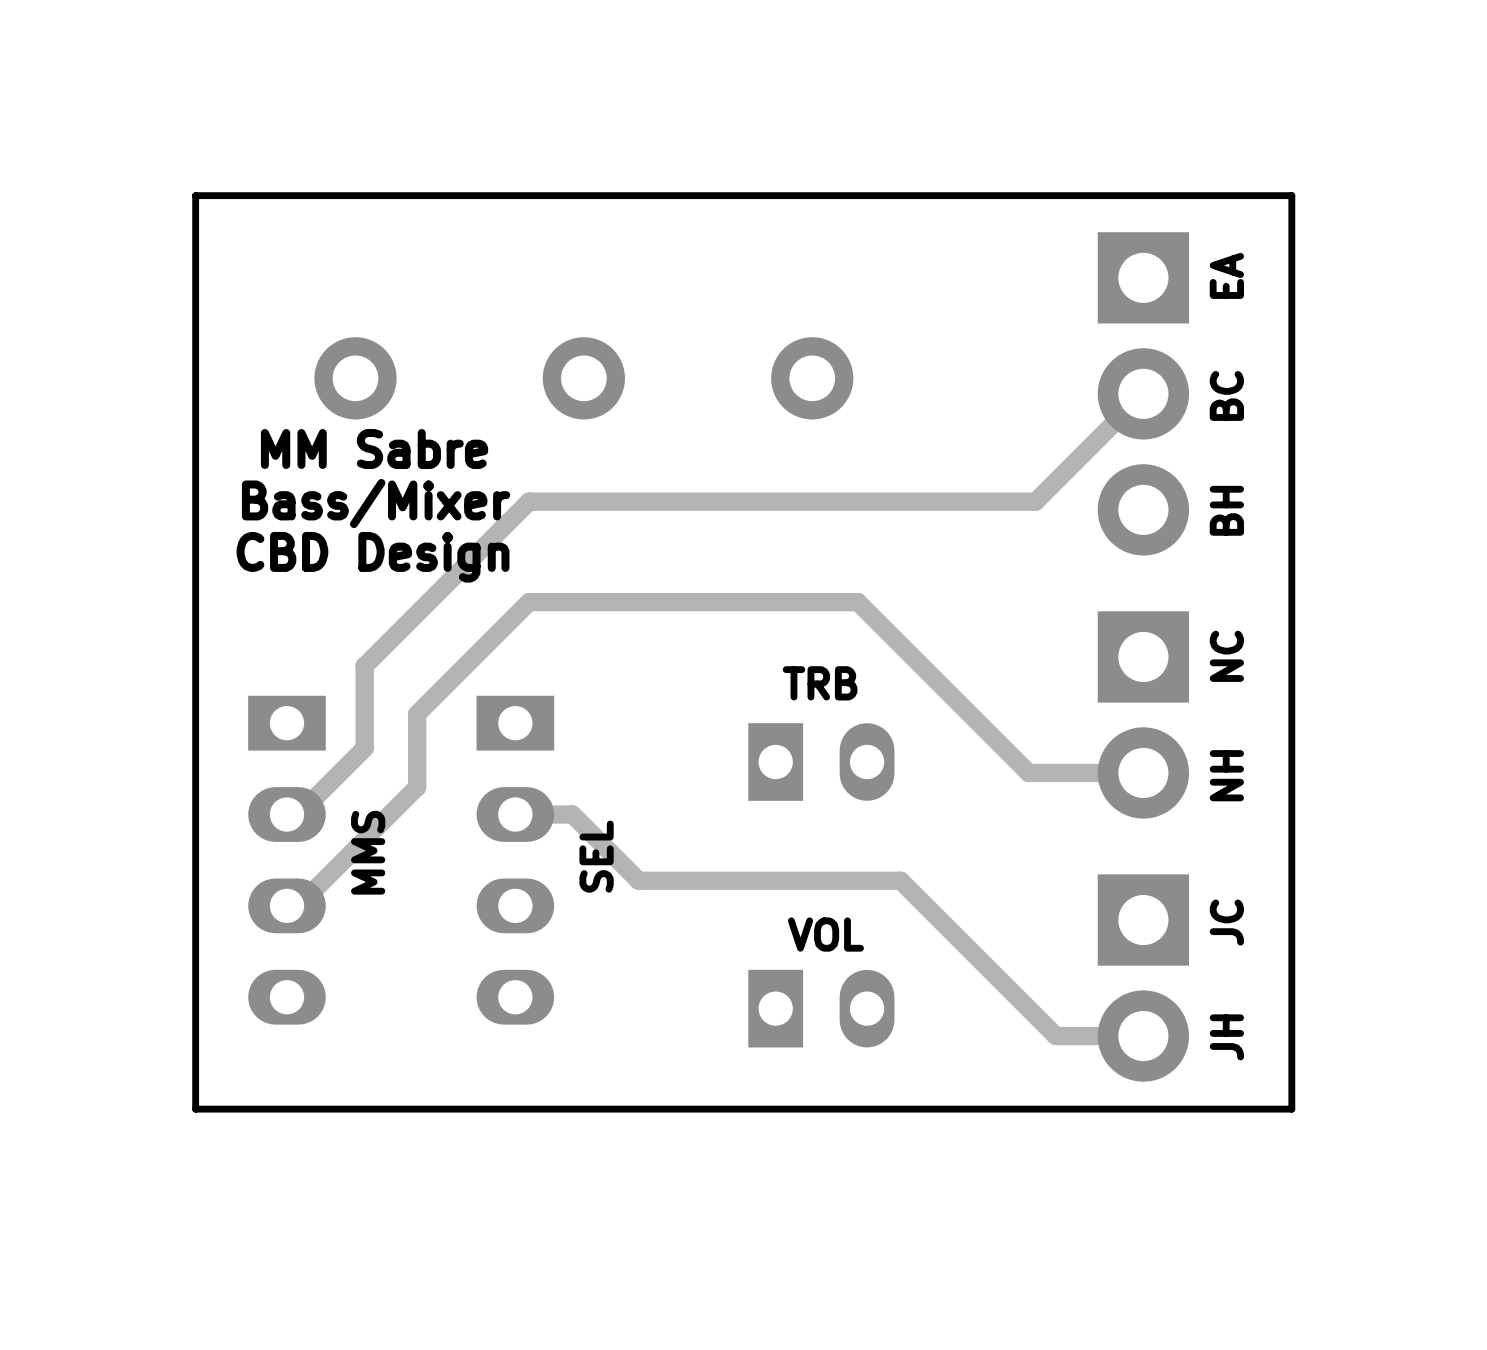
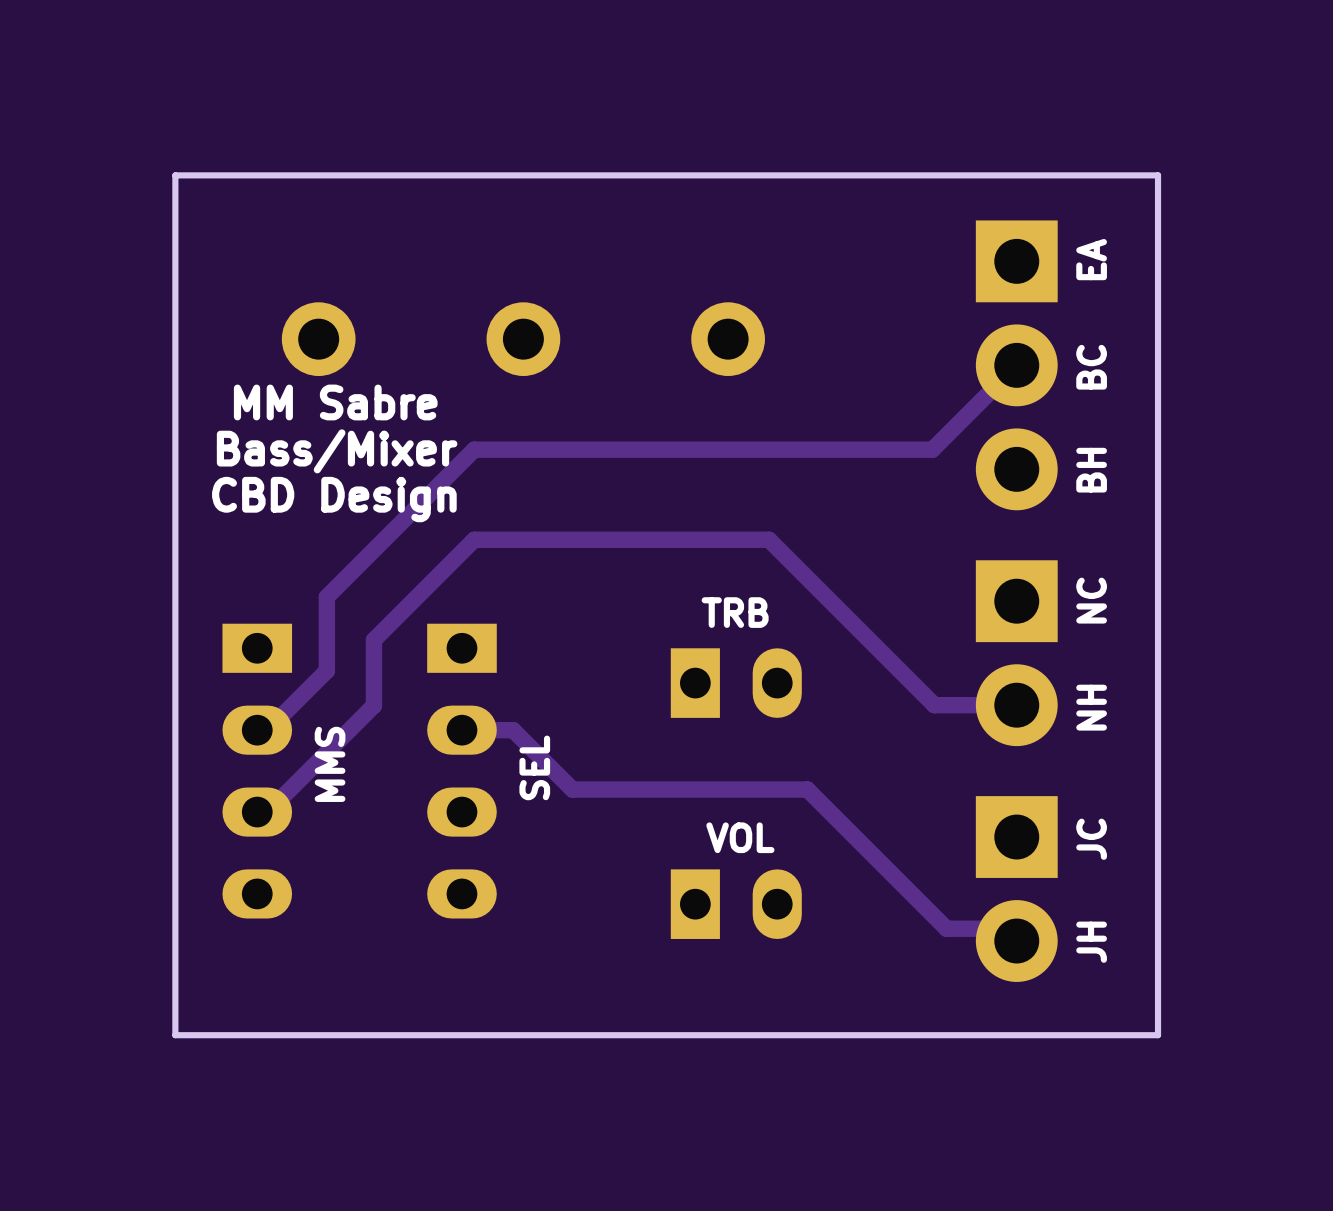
text position: EA (1226, 275) -> EA (1091, 259)
track: (1143, 393) (1035, 501) -> (1016, 365) (932, 449) (928, 449)
part position: (1143, 393) -> (1016, 365)
text position: BC (1226, 395) -> BC (1091, 367)
text position: BH (1226, 510) -> BH (1091, 470)
text position: NC (1226, 656) -> NC (1091, 600)
part position: (1143, 714) -> (1016, 653)
track: (1028, 772) (1143, 772) -> (922, 692) (934, 705) (1016, 705)
text position: NH (1226, 775) -> NH (1091, 707)
text position: JC (1226, 922) -> JC (1091, 839)
part position: (1143, 978) -> (1016, 889)
text position: JH (1226, 1037) -> JH (1091, 942)
board edge: (195, 1109) (1291, 1109) -> (175, 994) (175, 1035) (1158, 1035) (1158, 994)

